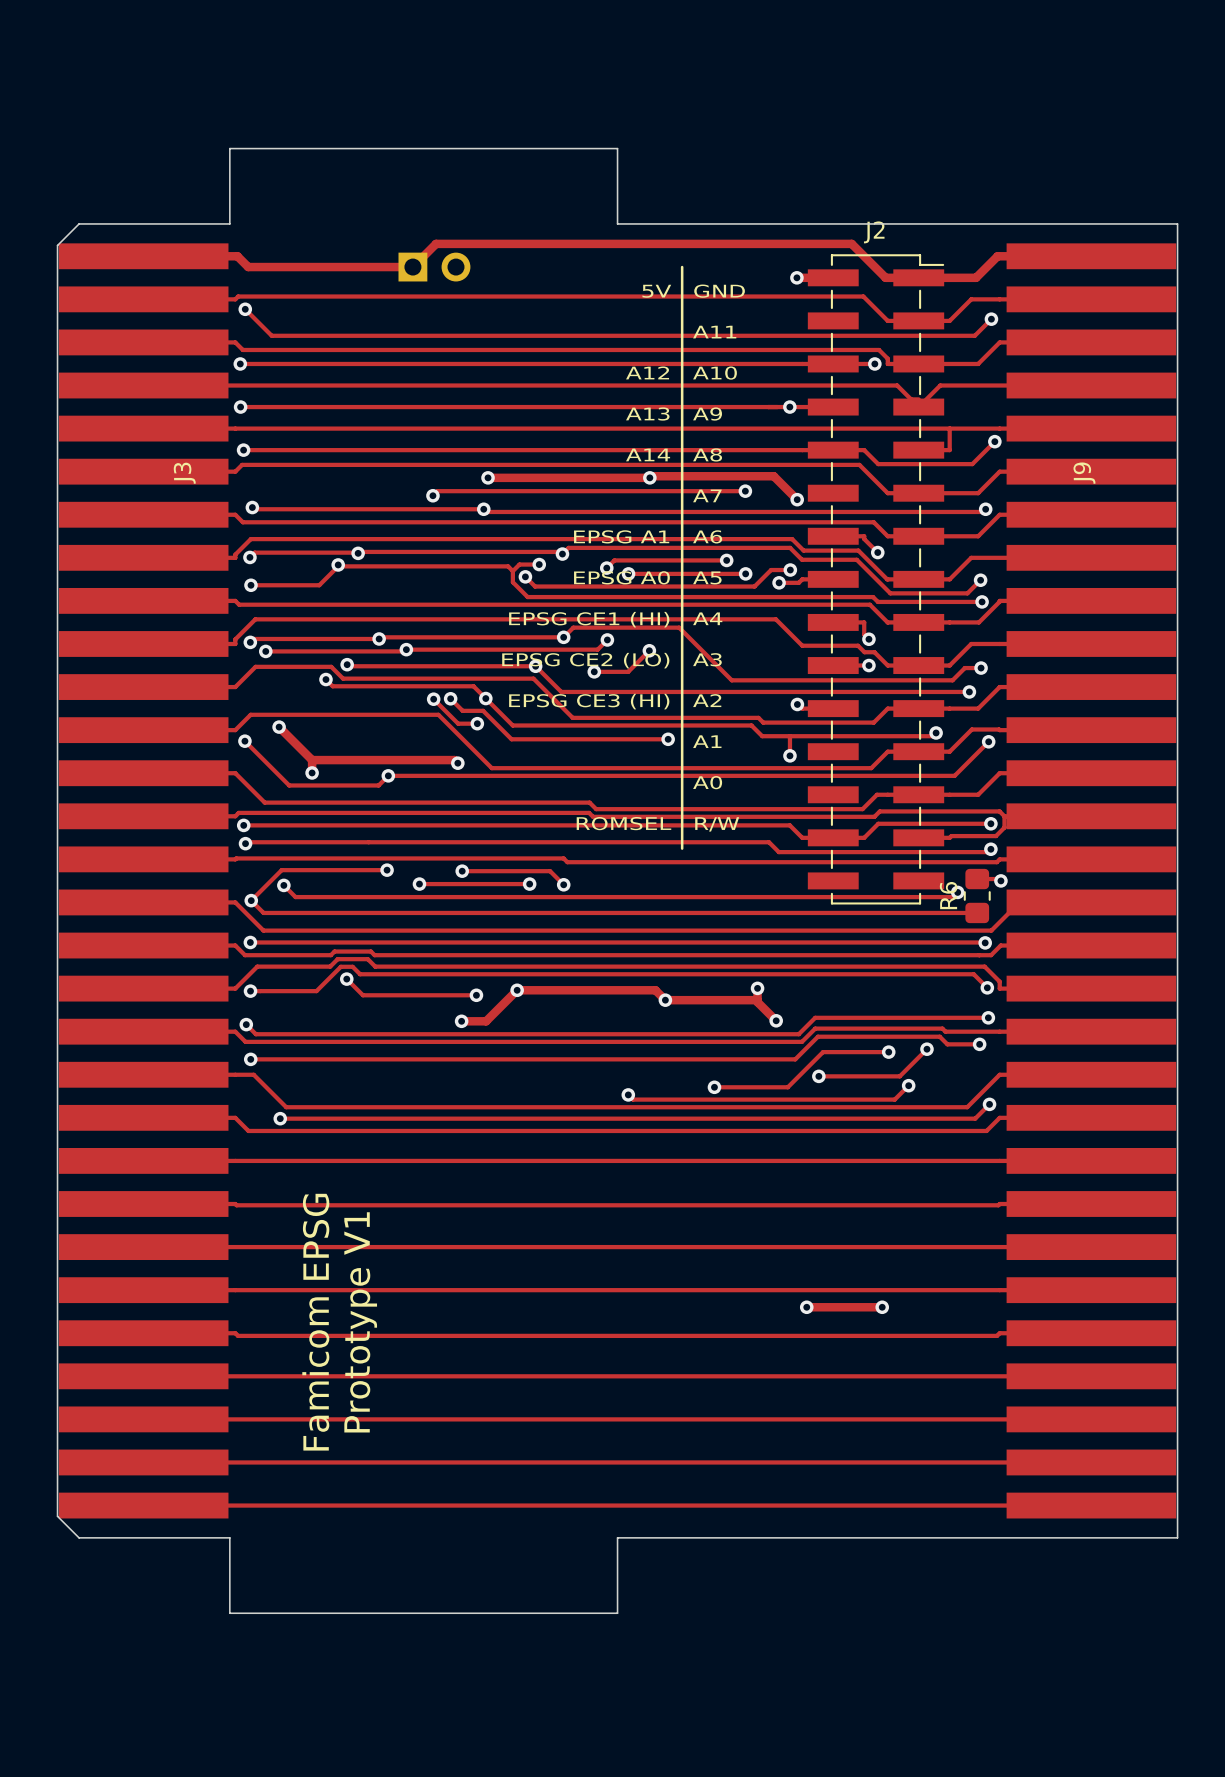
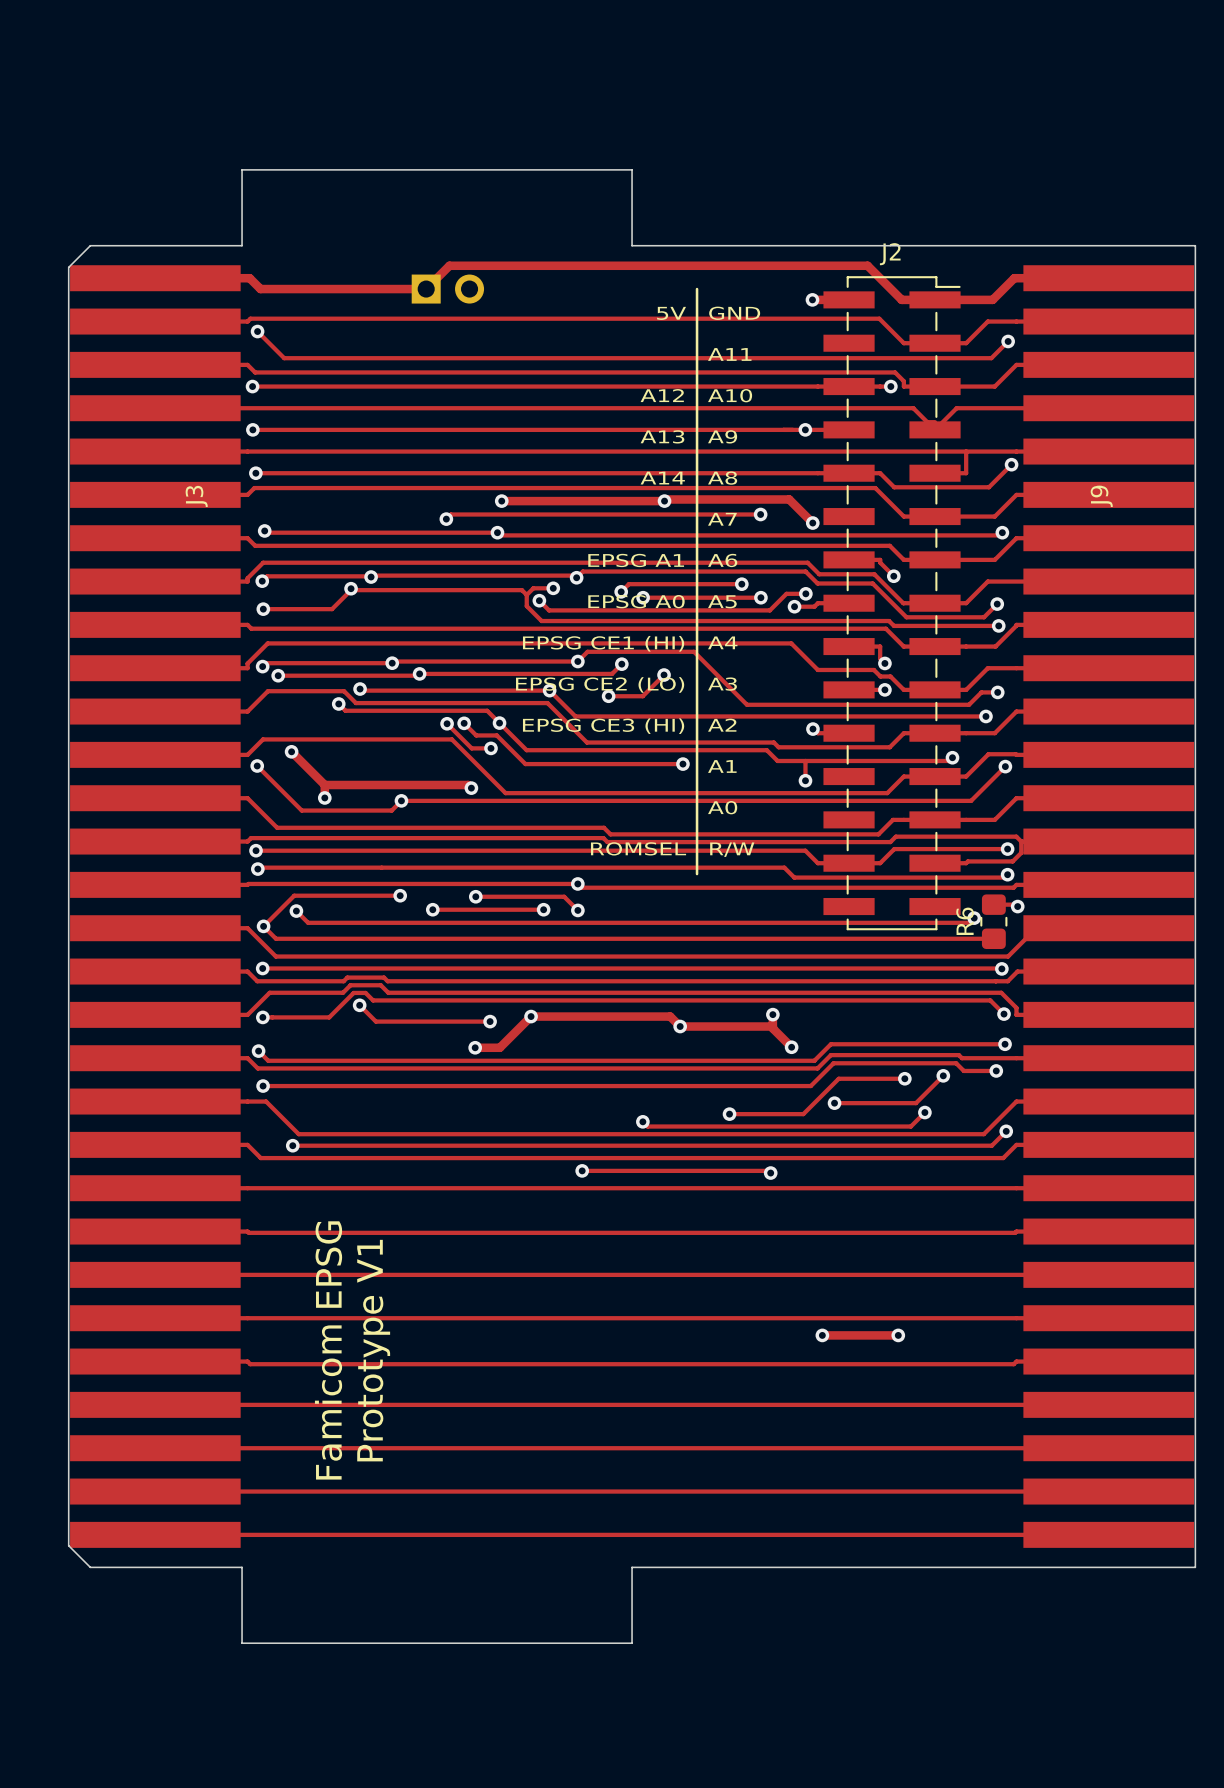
via: none -> (577, 883)
track: none -> (582, 1170) (768, 1170) (770, 1173)
via: none -> (582, 1170)
via: none -> (770, 1173)

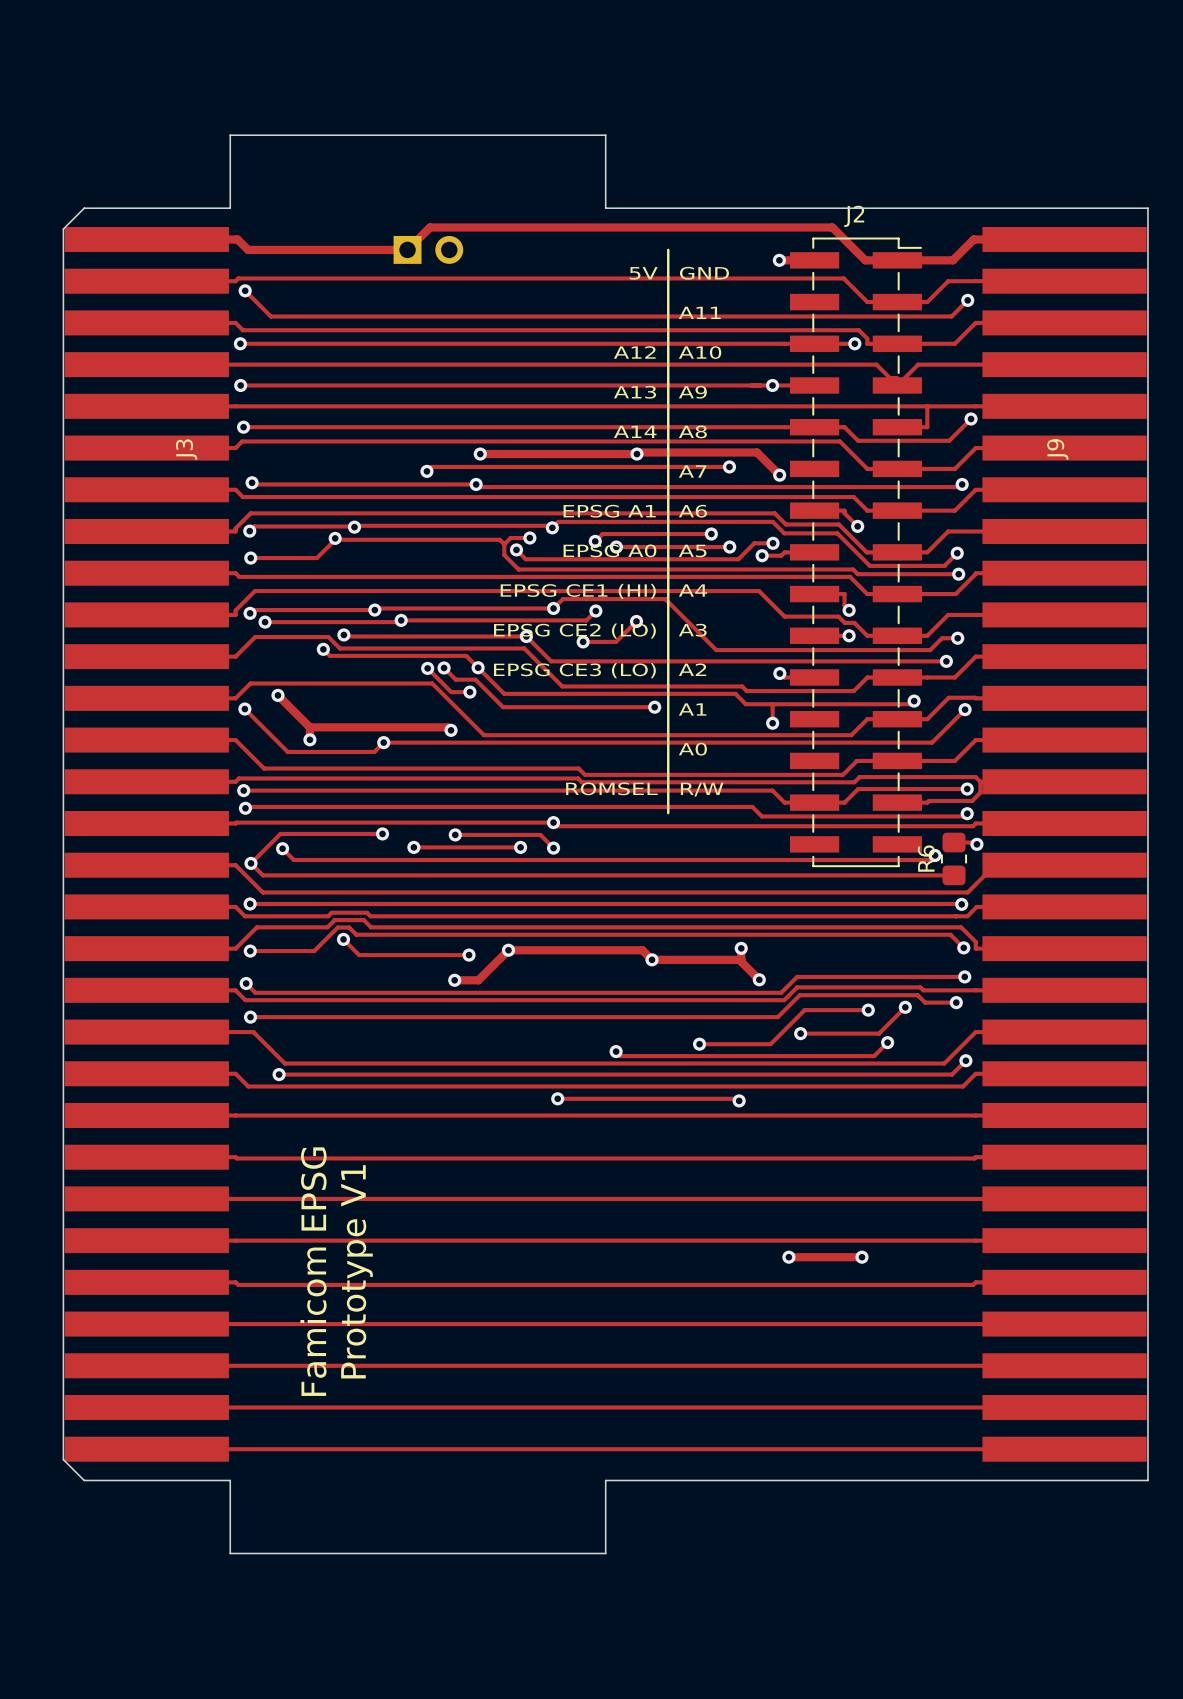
text: EPSG CE3 (HI) (603, 726) -> EPSG CE3 (LO) (574, 670)

